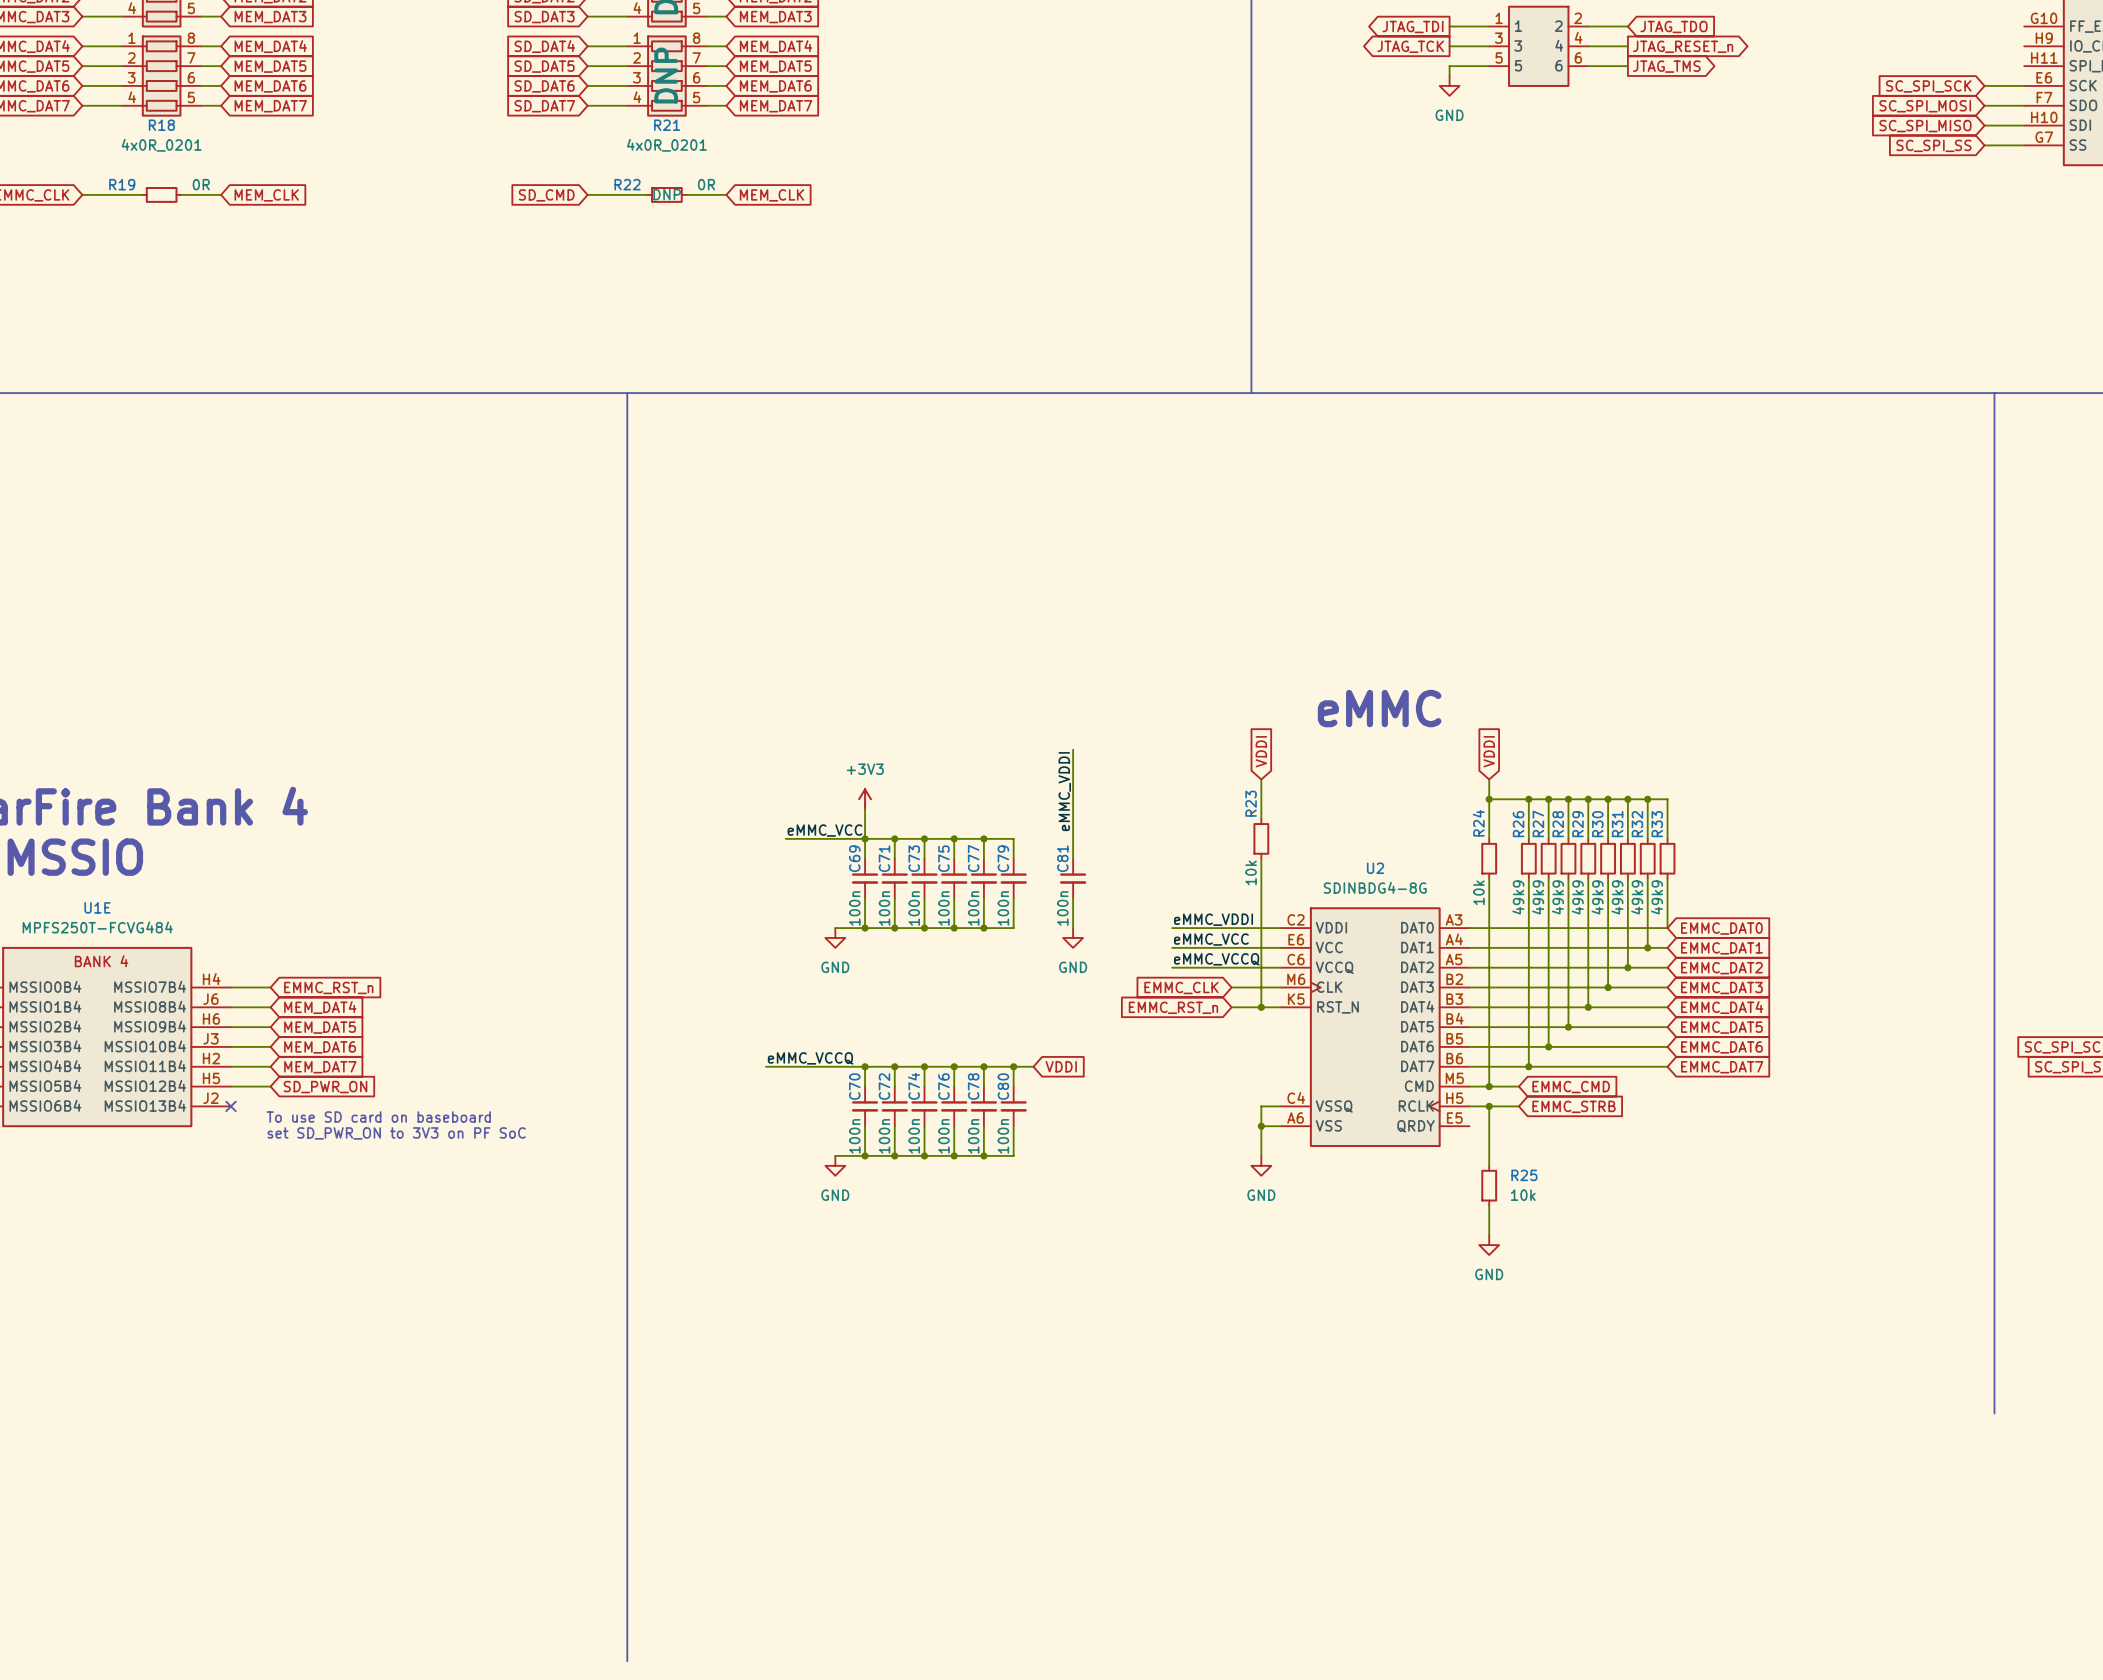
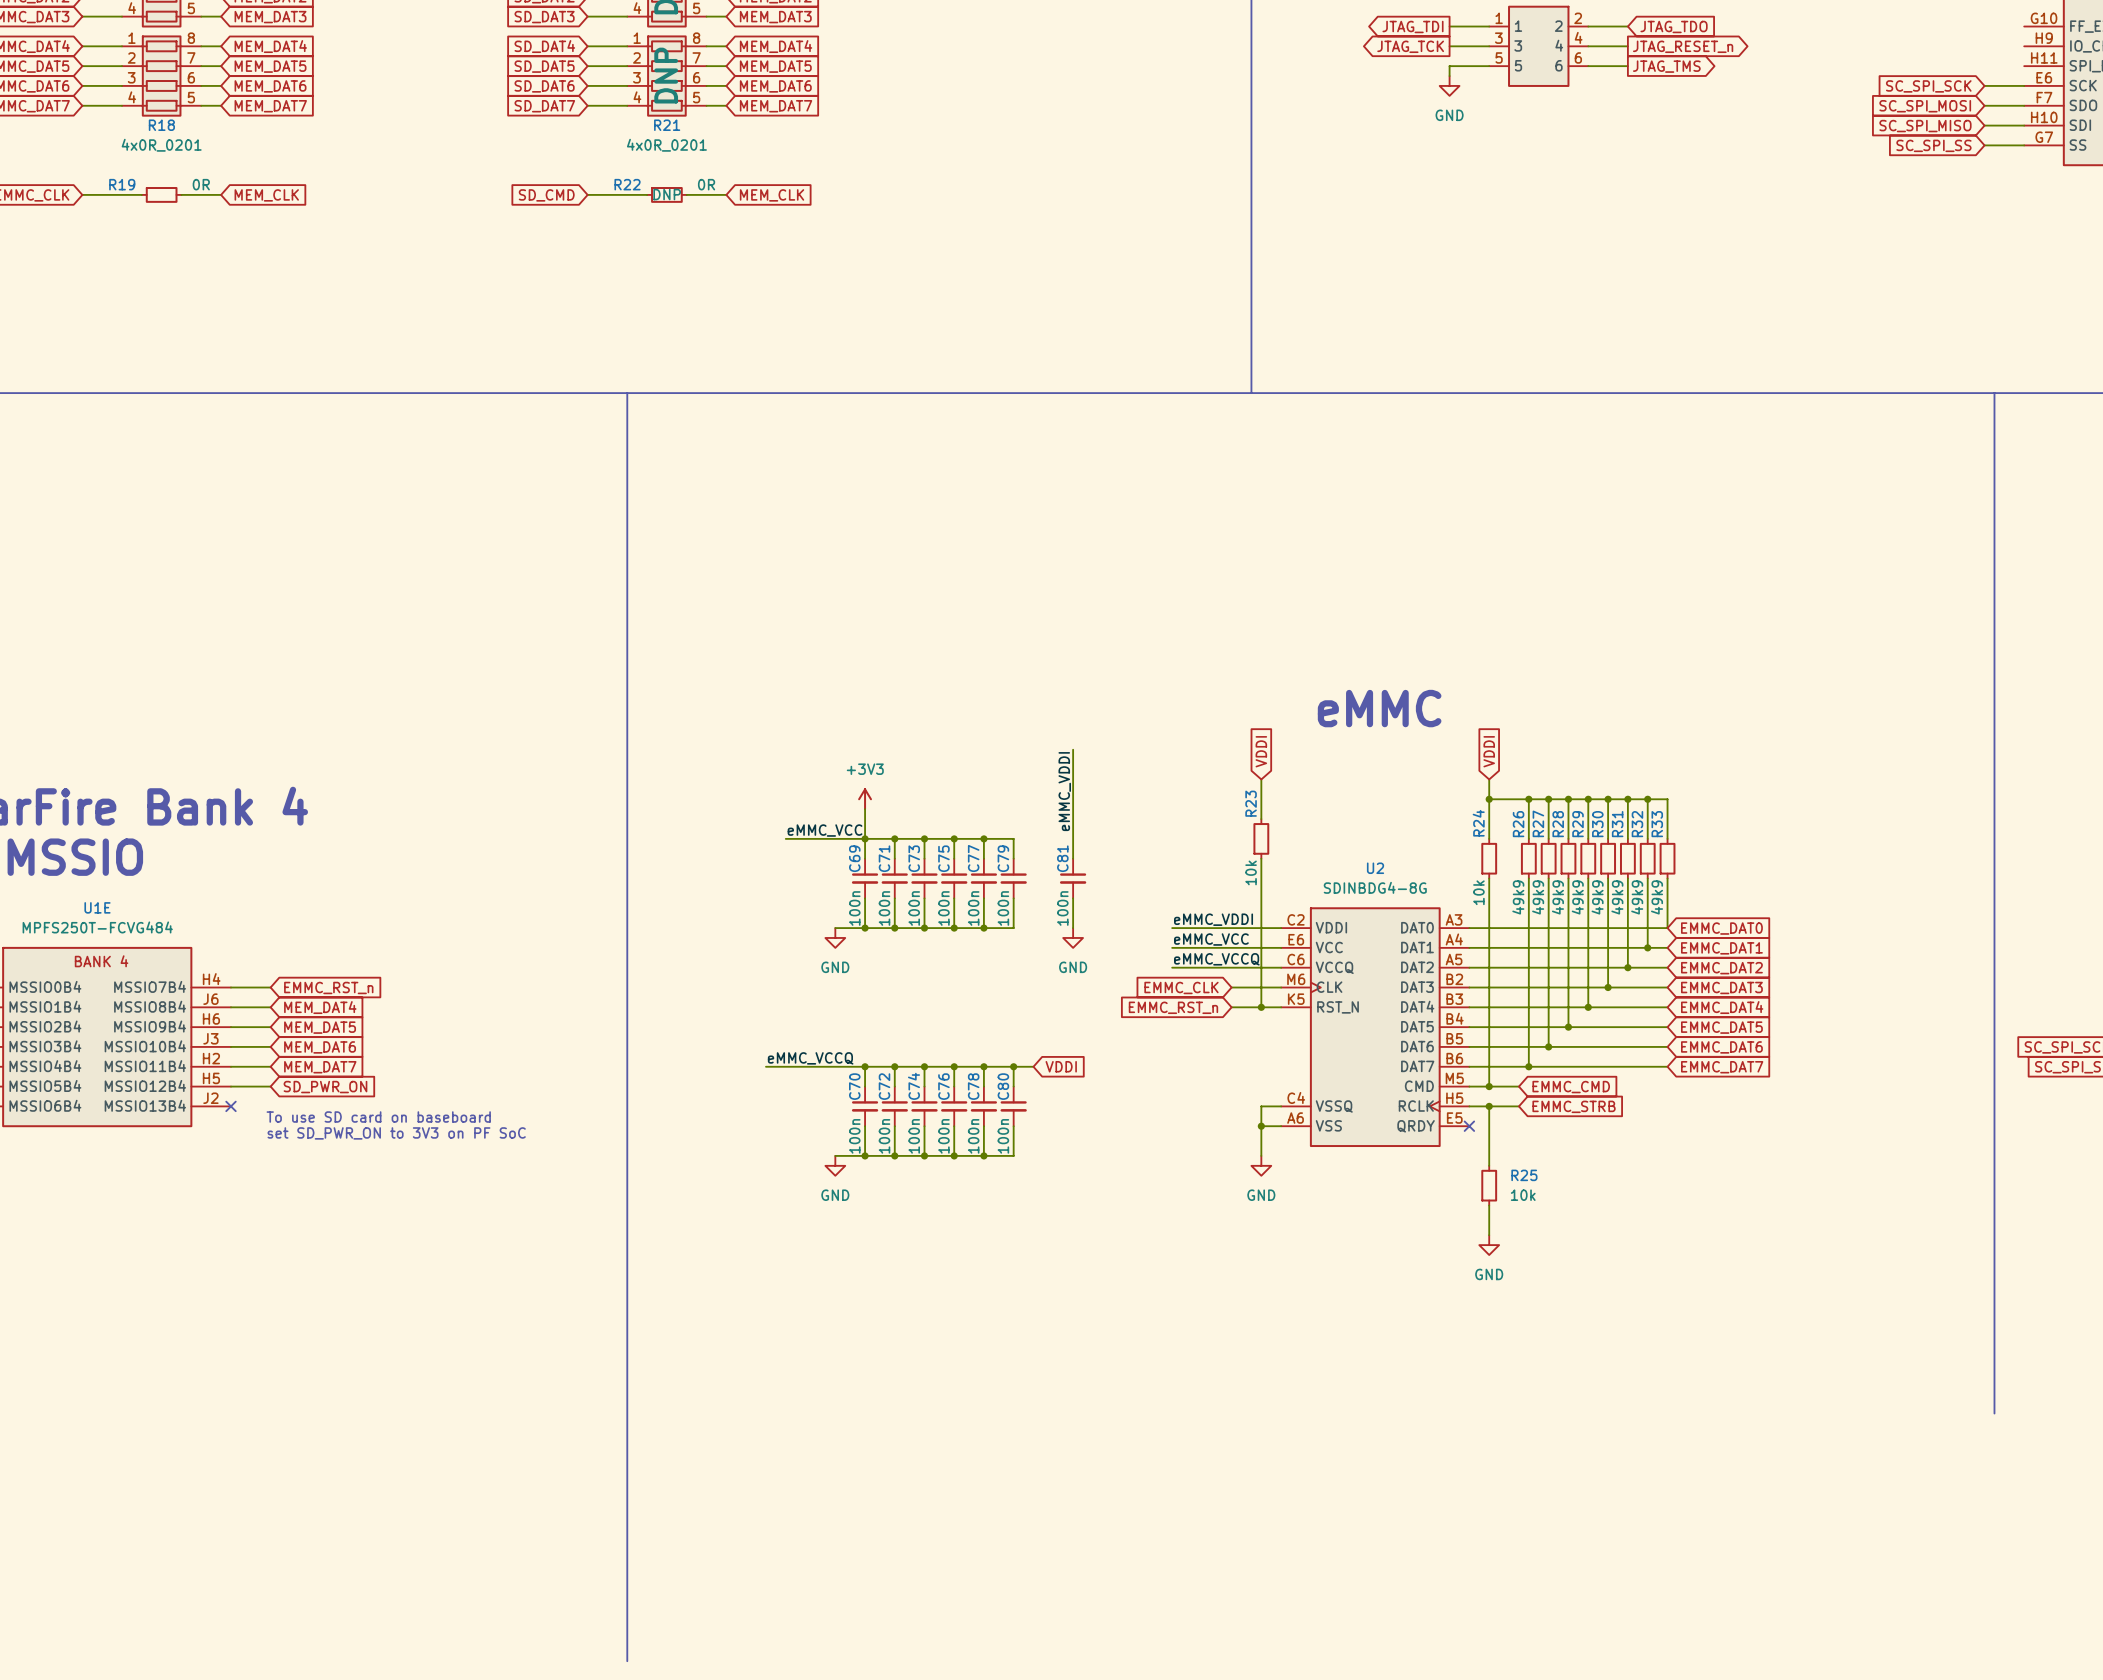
no-connect mark: none -> (1469, 1126)

